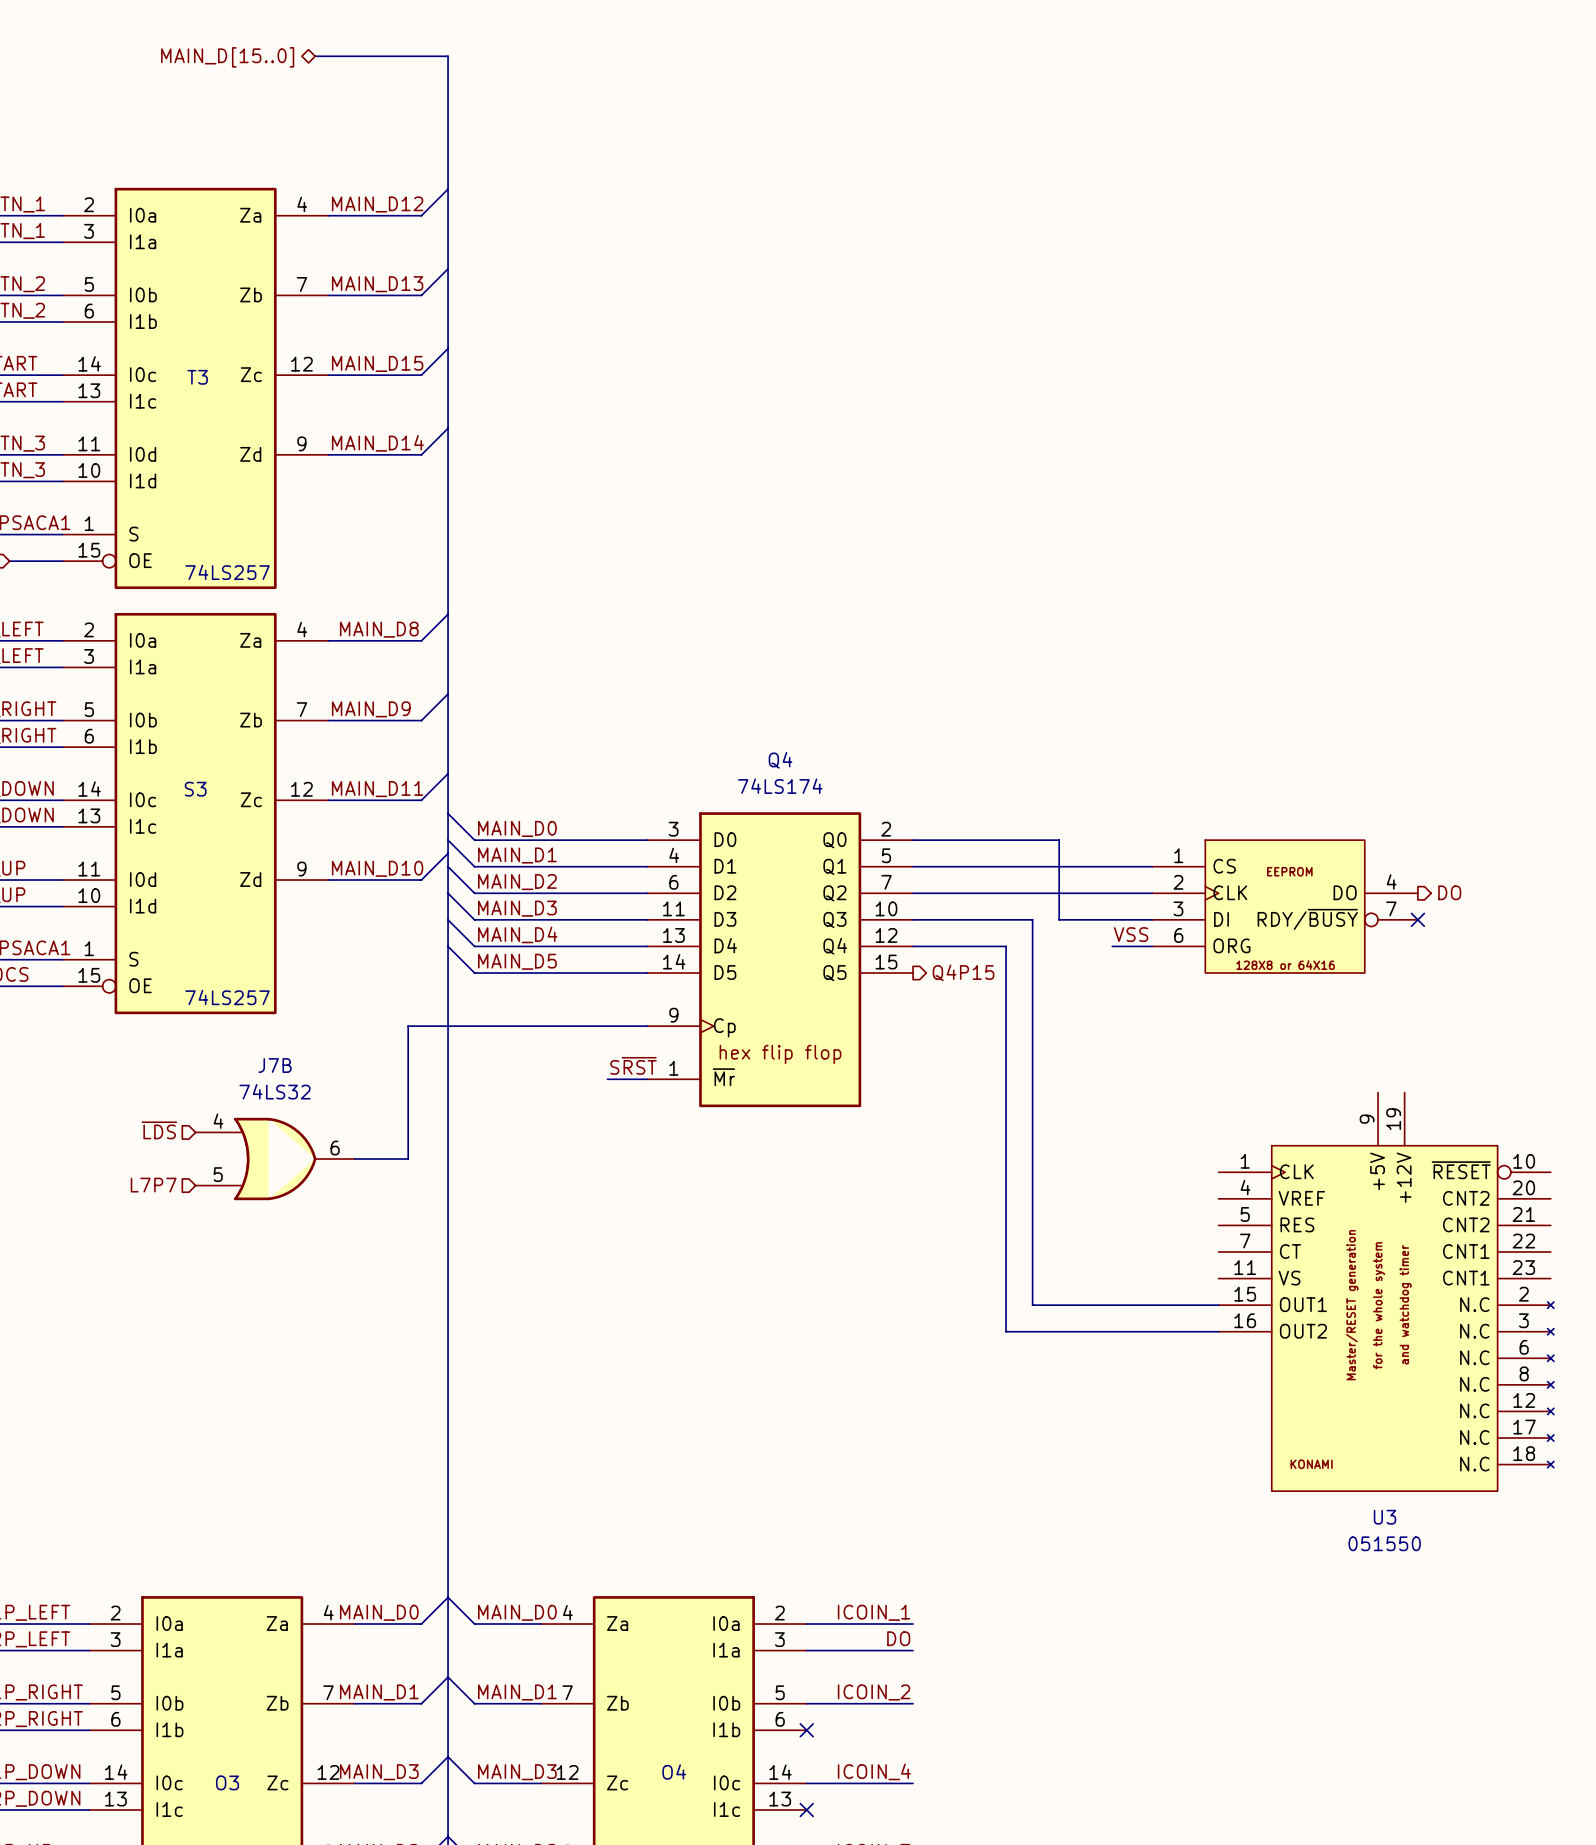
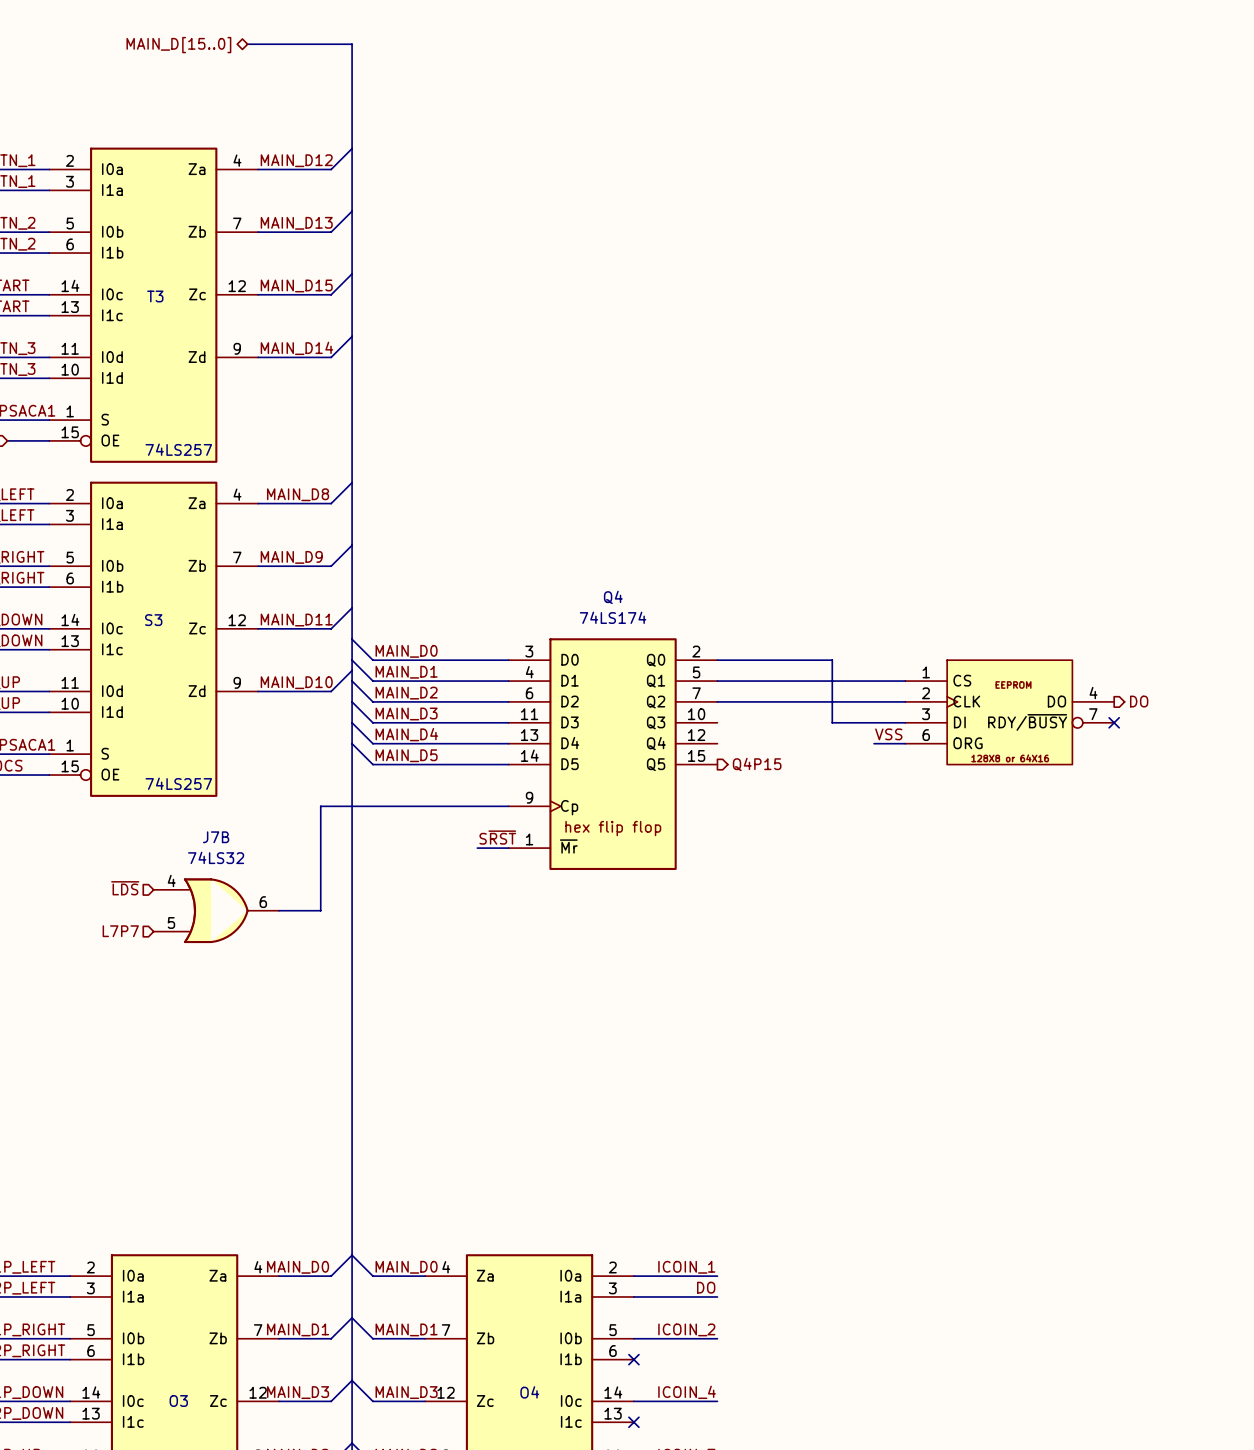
wire: (913, 919) (1032, 919) (1032, 1305) (1218, 1305) -> none
wire: (913, 946) (1006, 946) (1006, 1331) (1218, 1331) -> none
U3: 051550 (1386, 1292) -> none

